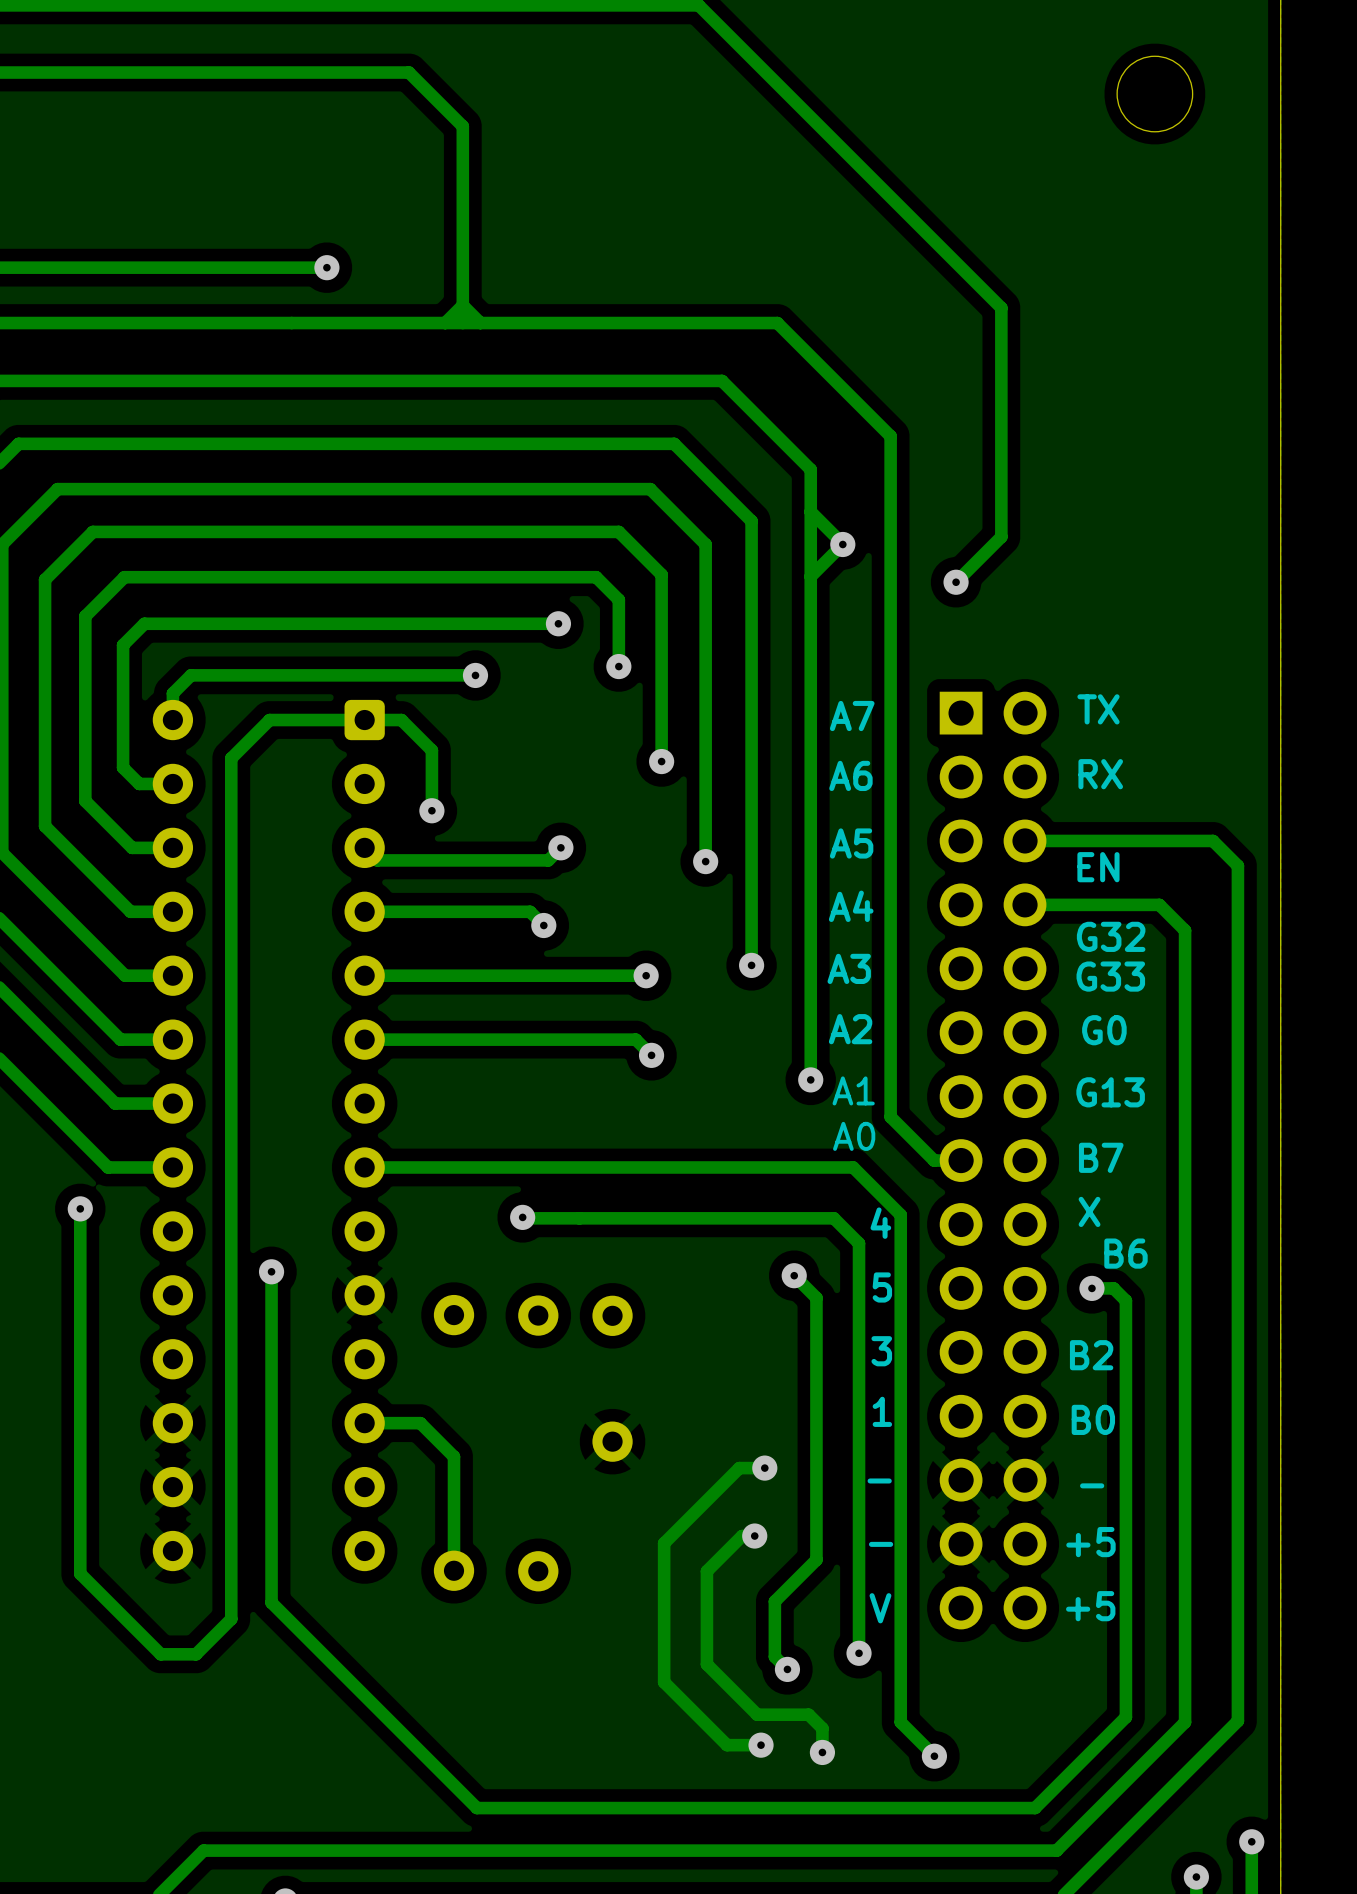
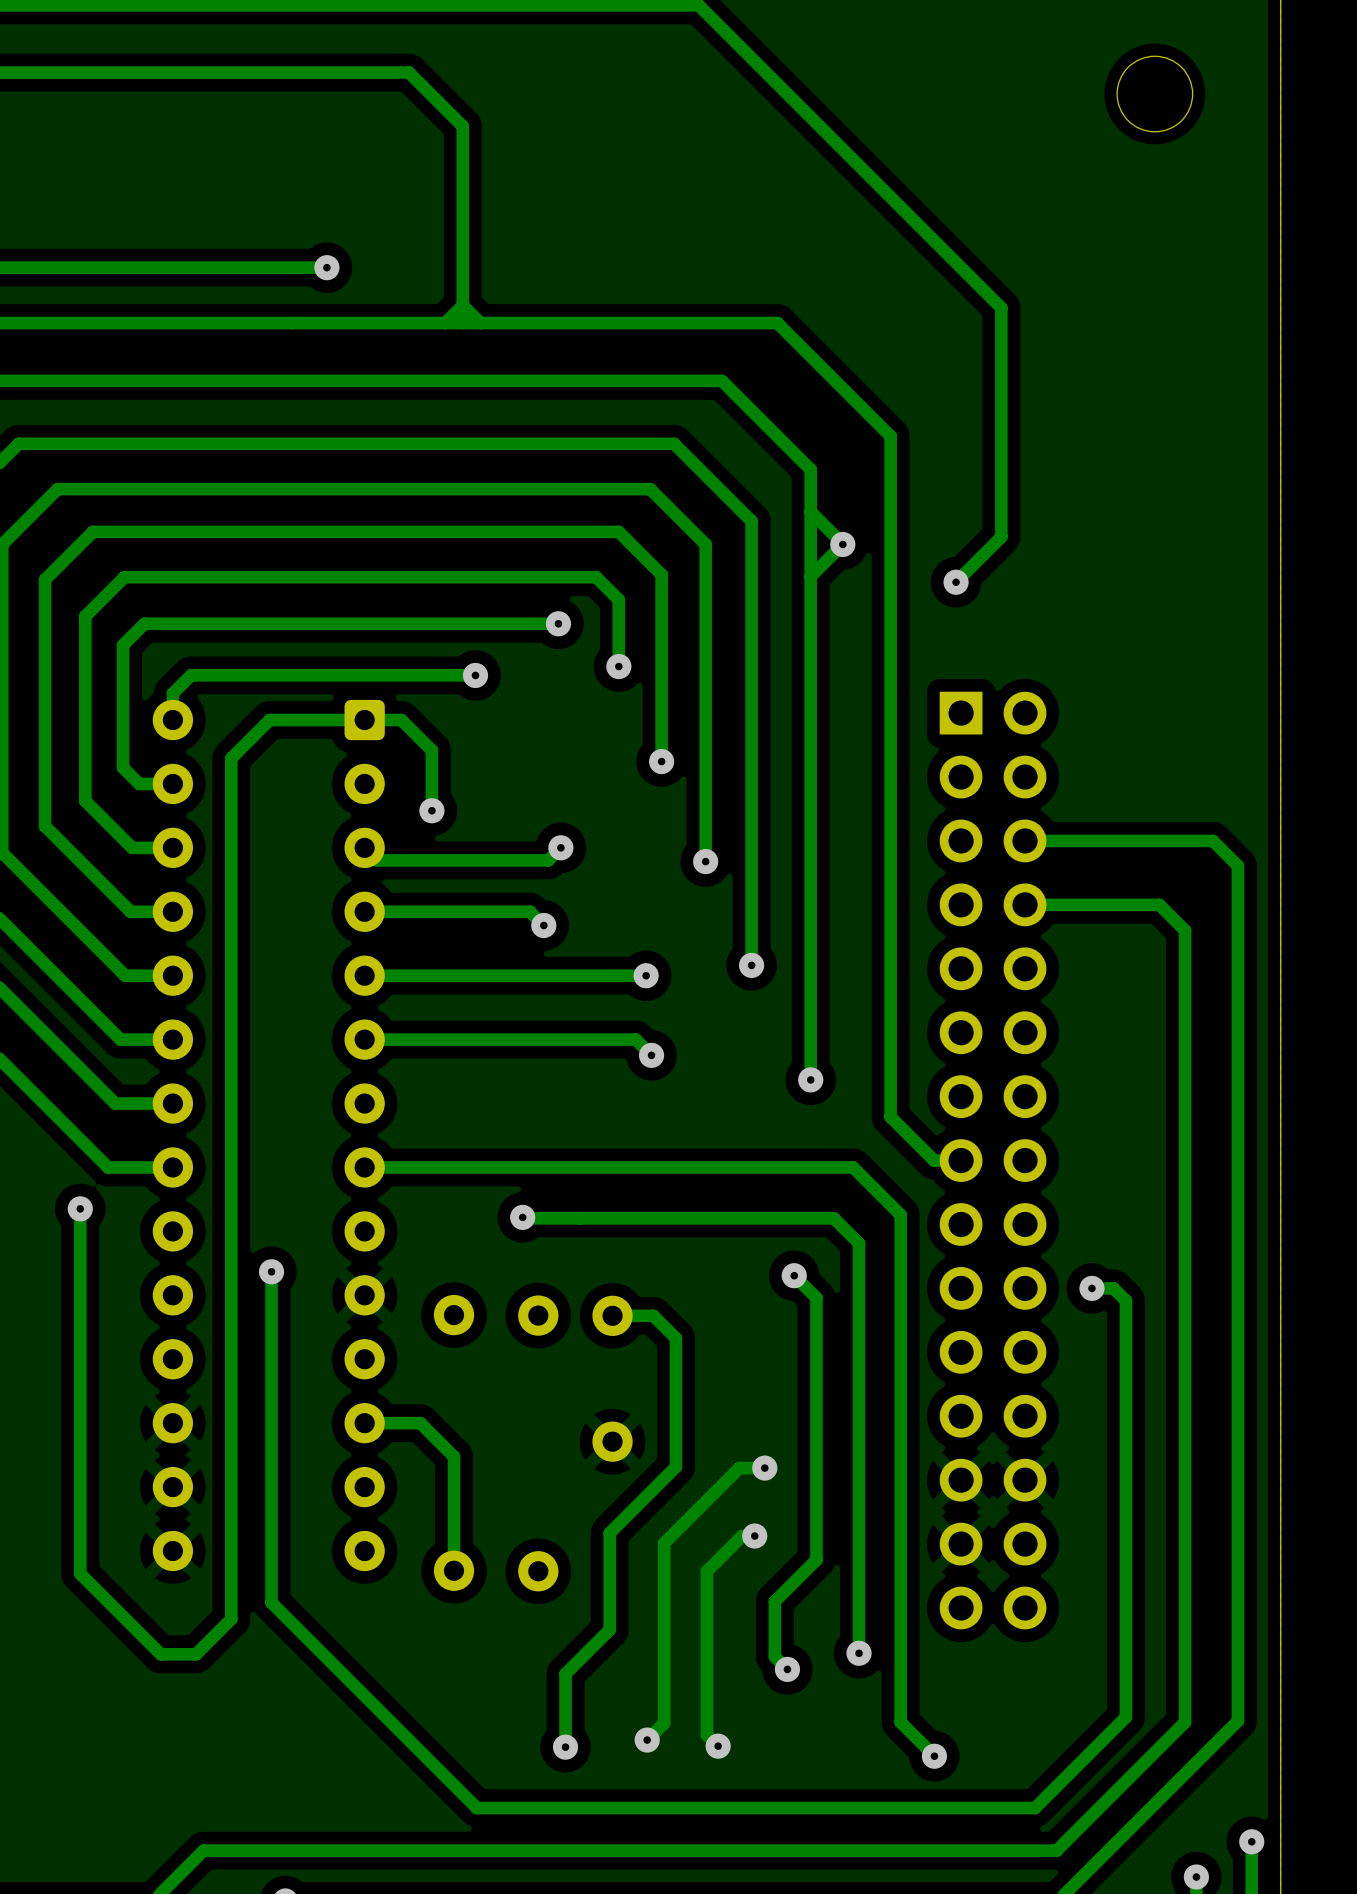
text: TX (1098, 709) -> none
text: A7 (852, 716) -> none
text: RX (1100, 774) -> none
text: A6 (850, 775) -> none
text: A5 (851, 843) -> none
text: EN (1098, 867) -> none
text: A4 (851, 906) -> none
text: G32 (1111, 936) -> none
text: A3 (849, 968) -> none
text: G33 (1110, 976) -> none
text: A2 (850, 1029) -> none
text: G0 (1104, 1030) -> none
text: A1 (853, 1090) -> none
text: G13 (1110, 1092) -> none
text: A0 (854, 1136) -> none
text: B7 (1101, 1157) -> none
text: X (1089, 1211) -> none
text: 4 (880, 1223) -> none
text: B6 (1125, 1253) -> none
text: 5 (882, 1287) -> none
track: none -> (612, 1315) (653, 1315) (675, 1338) (675, 1466) (609, 1533) (609, 1629) (565, 1673) (565, 1747)
text: 3 (881, 1351) -> none
text: B2 (1091, 1355) -> none
text: 1 (882, 1411) -> none
text: B0 (1093, 1419) -> none
text: - (879, 1480) -> none
text: - (1092, 1485) -> none
text: +5 (1090, 1542) -> none
text: - (881, 1544) -> none
text: +5 (1090, 1606) -> none
text: V (880, 1608) -> none
track: (706, 1664) (757, 1714) (808, 1714) (822, 1728) (822, 1752) -> (706, 1664) (706, 1734) (718, 1746)
track: (664, 1682) (727, 1745) (761, 1745) -> (664, 1682) (664, 1723) (647, 1740)
via: none -> (647, 1740)
via position: (761, 1745) -> (718, 1746)
via: none -> (565, 1747)
via: (822, 1752) -> none

